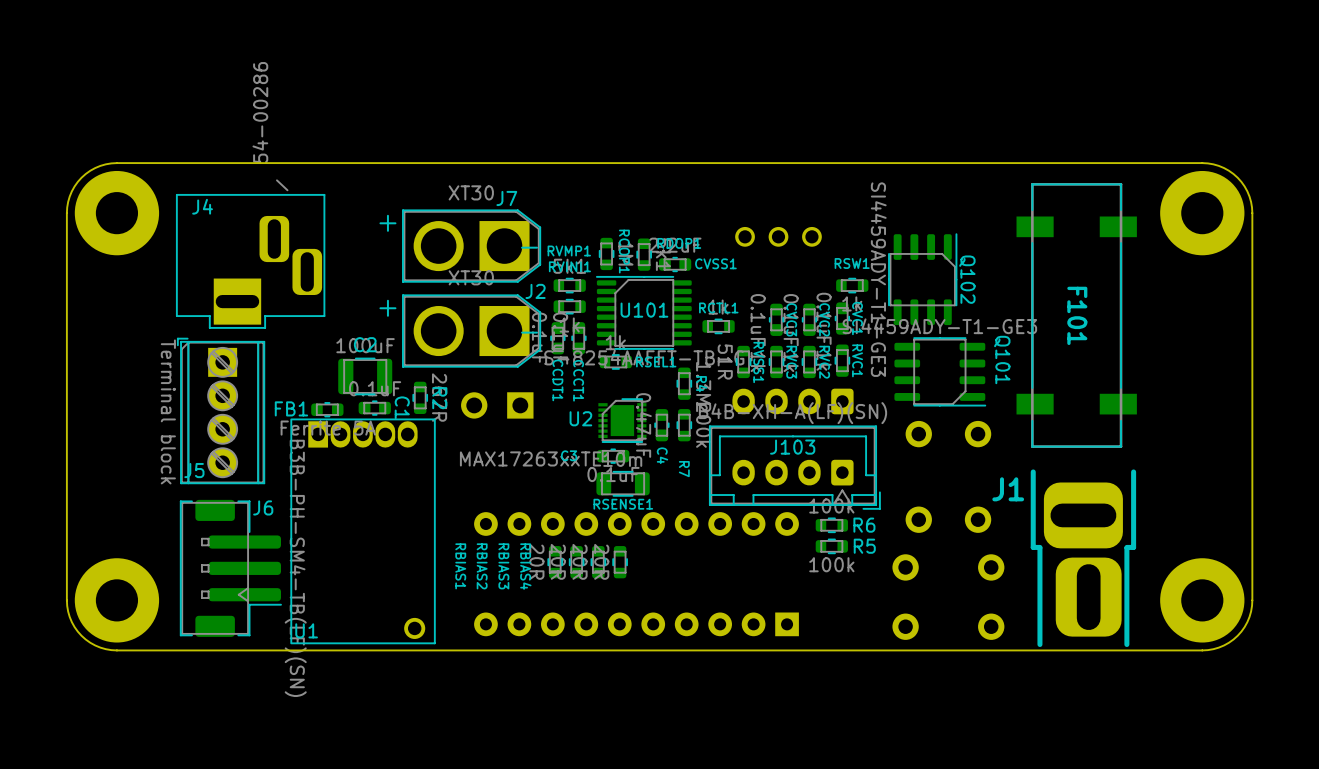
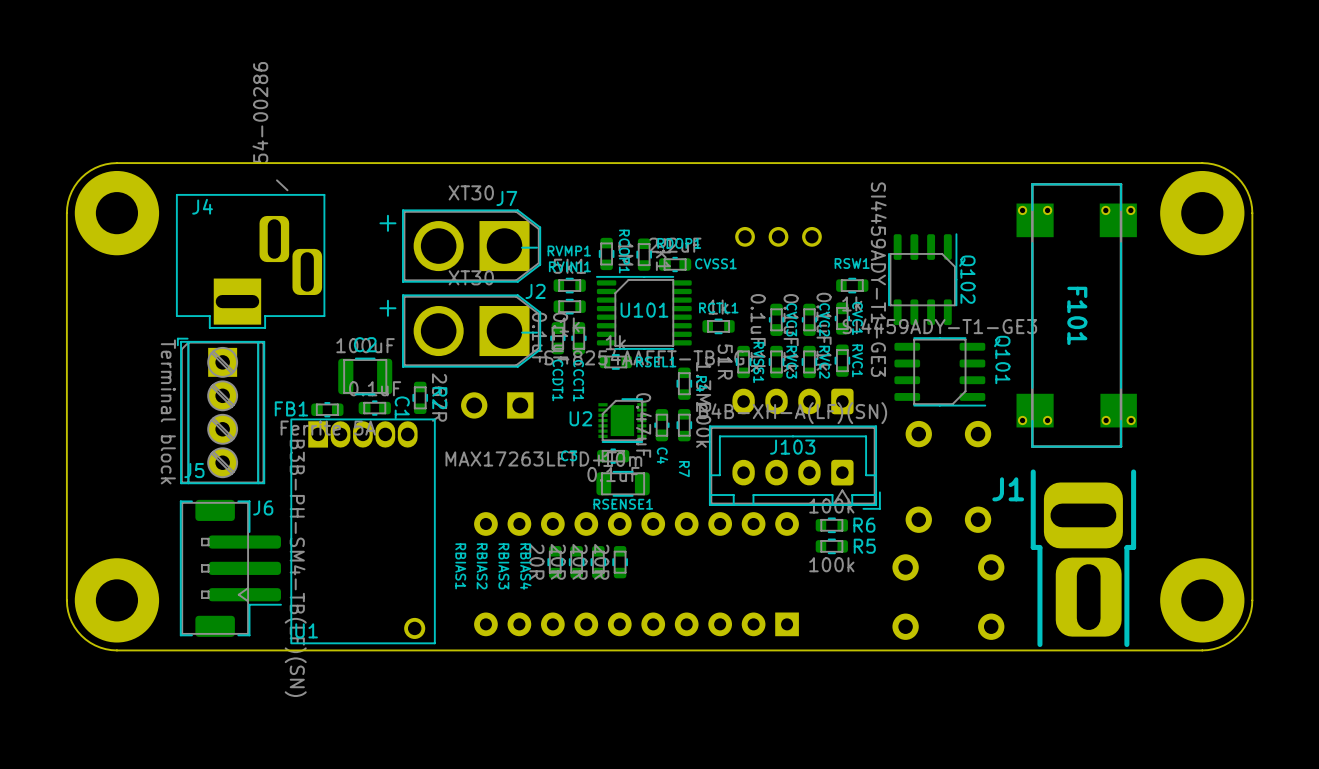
F101 footprint: [1016, 183, 1137, 448] -> [1016, 183, 1137, 448]
U2 value: MAX17263xxTE (530, 458) -> MAX17263LETD+T (531, 458)

